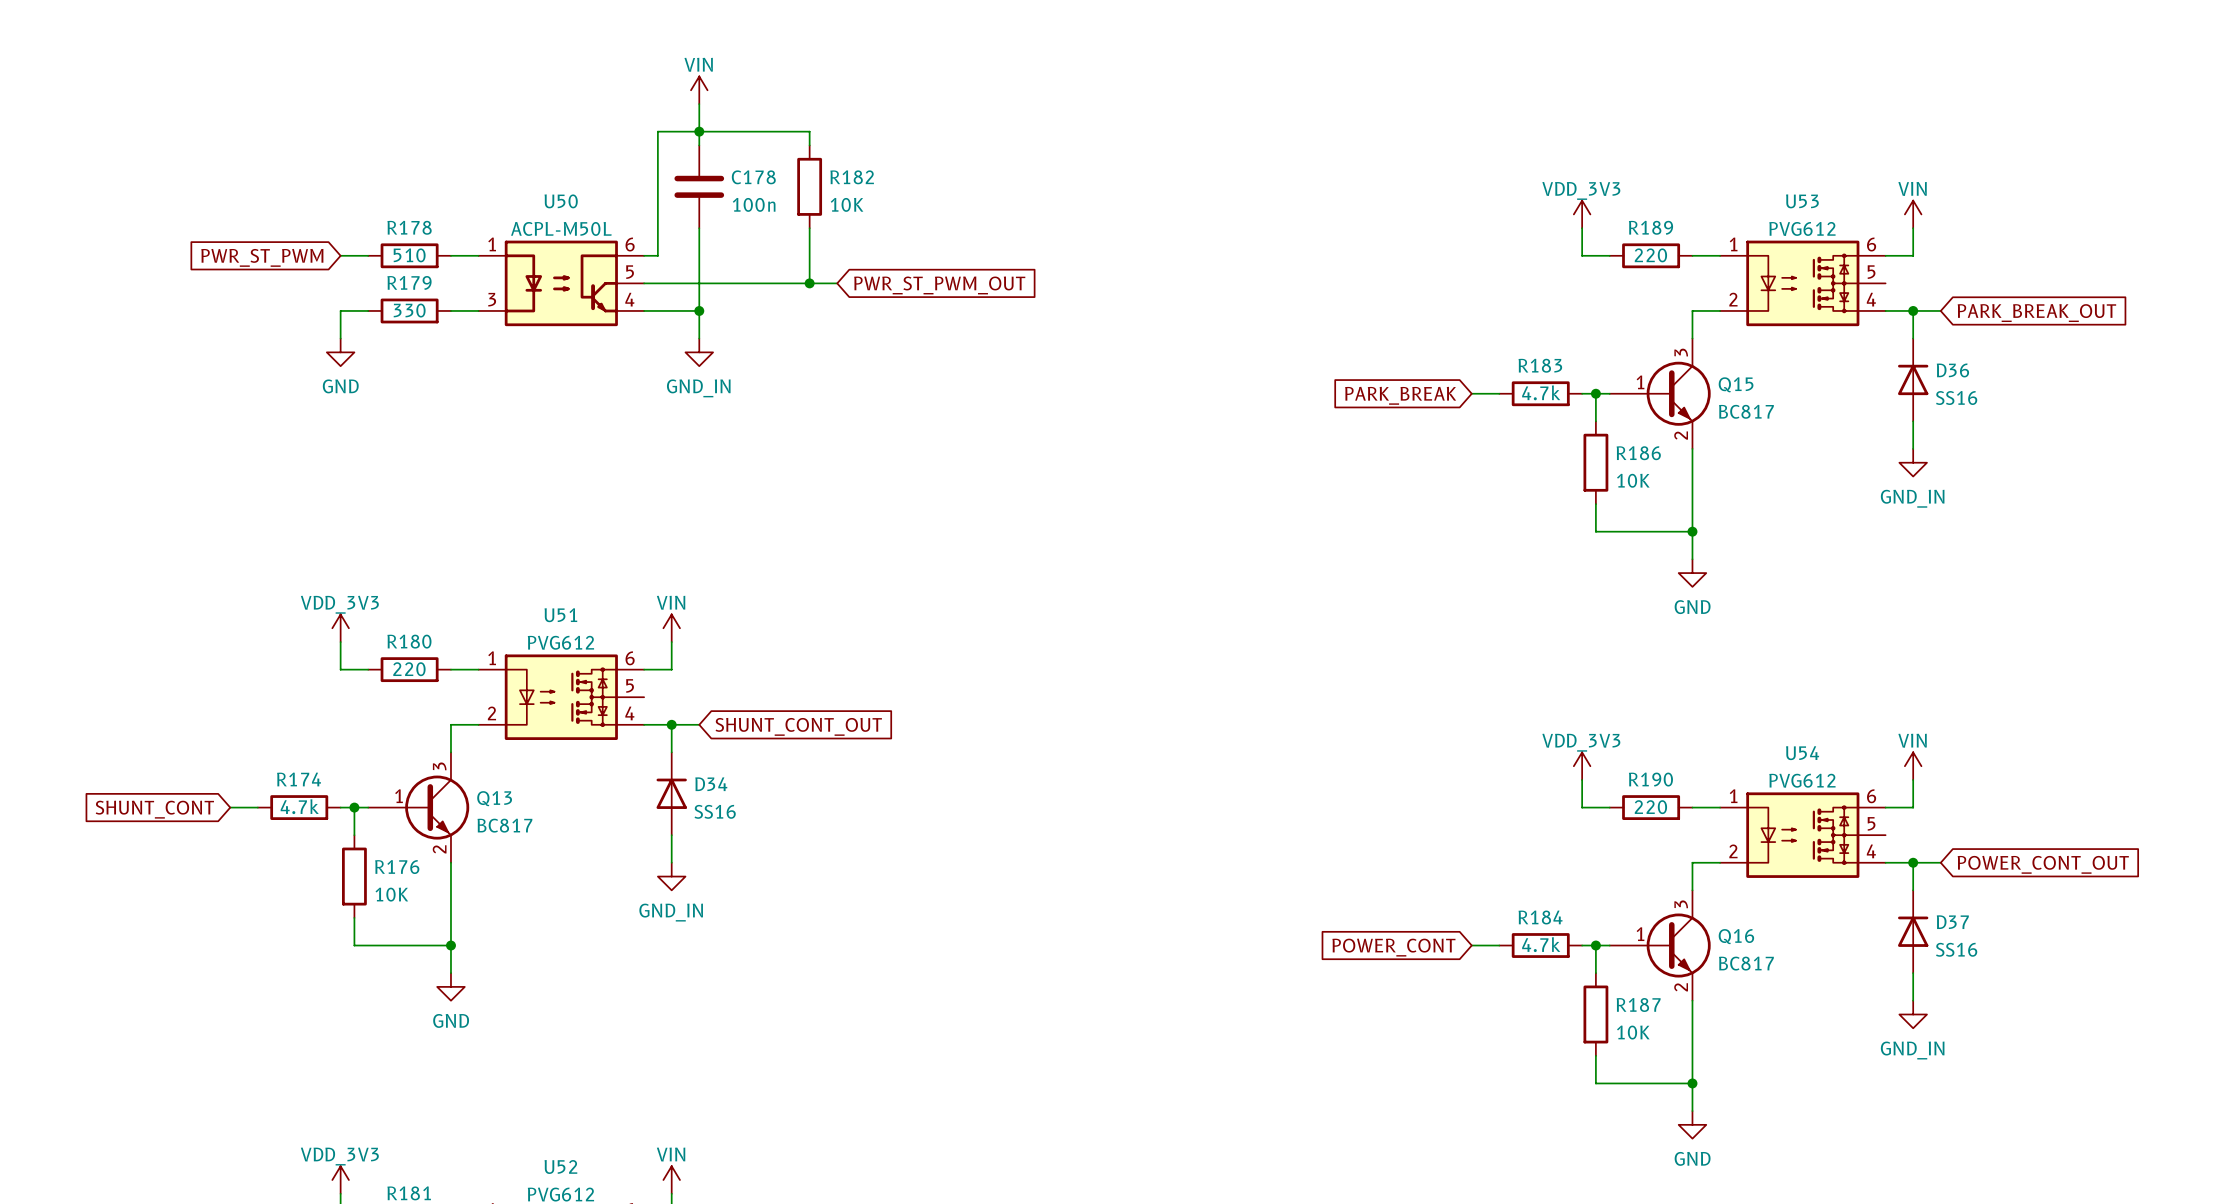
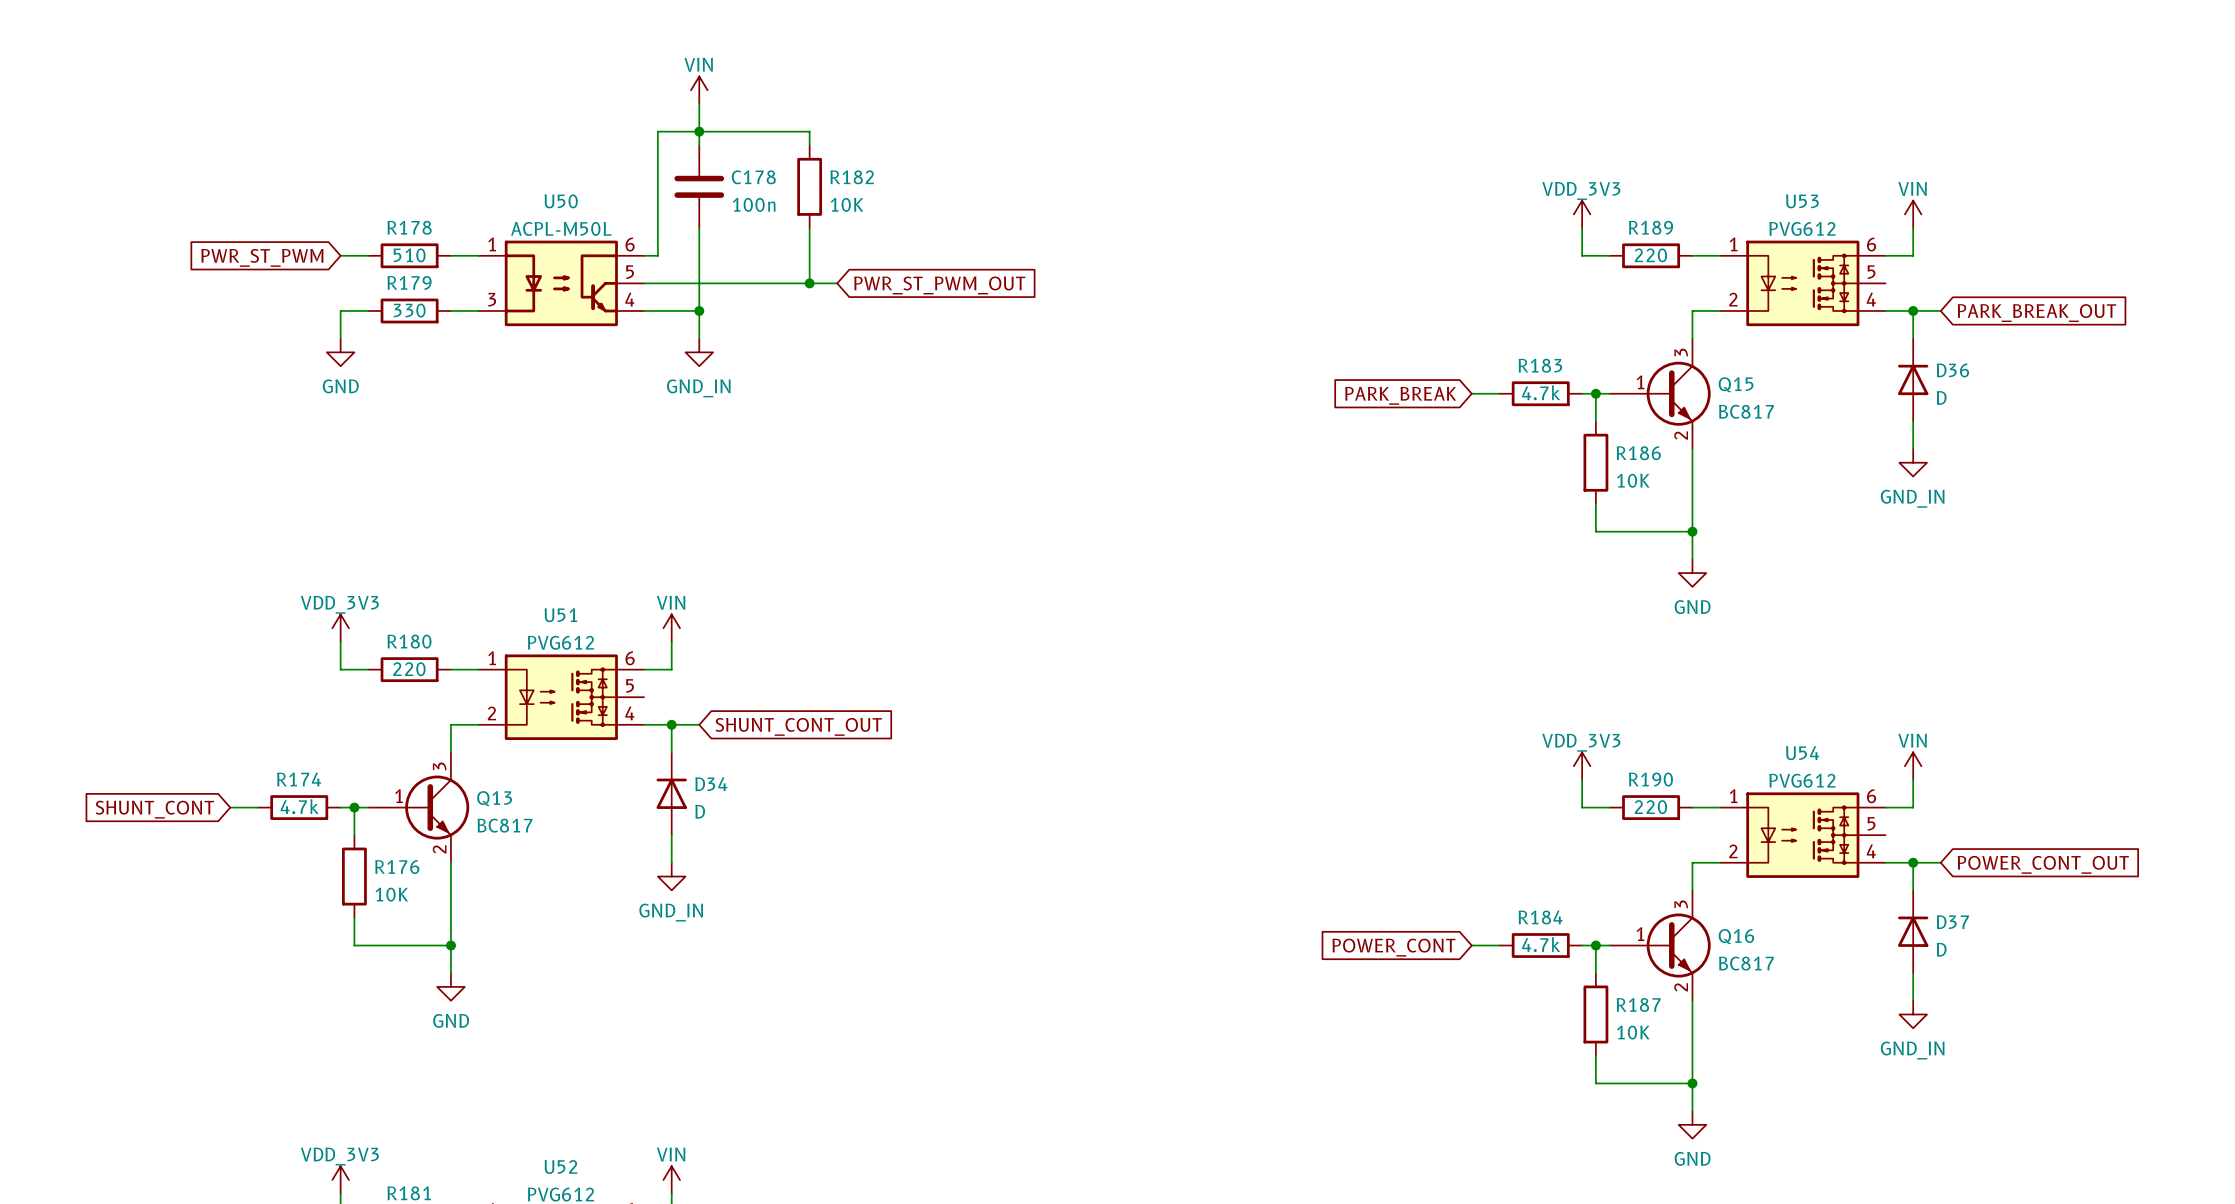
D36 value: SS16 (1956, 398) -> D (1941, 397)
D34 value: SS16 (715, 811) -> D (700, 811)
D37 value: SS16 (1956, 949) -> D (1941, 949)

